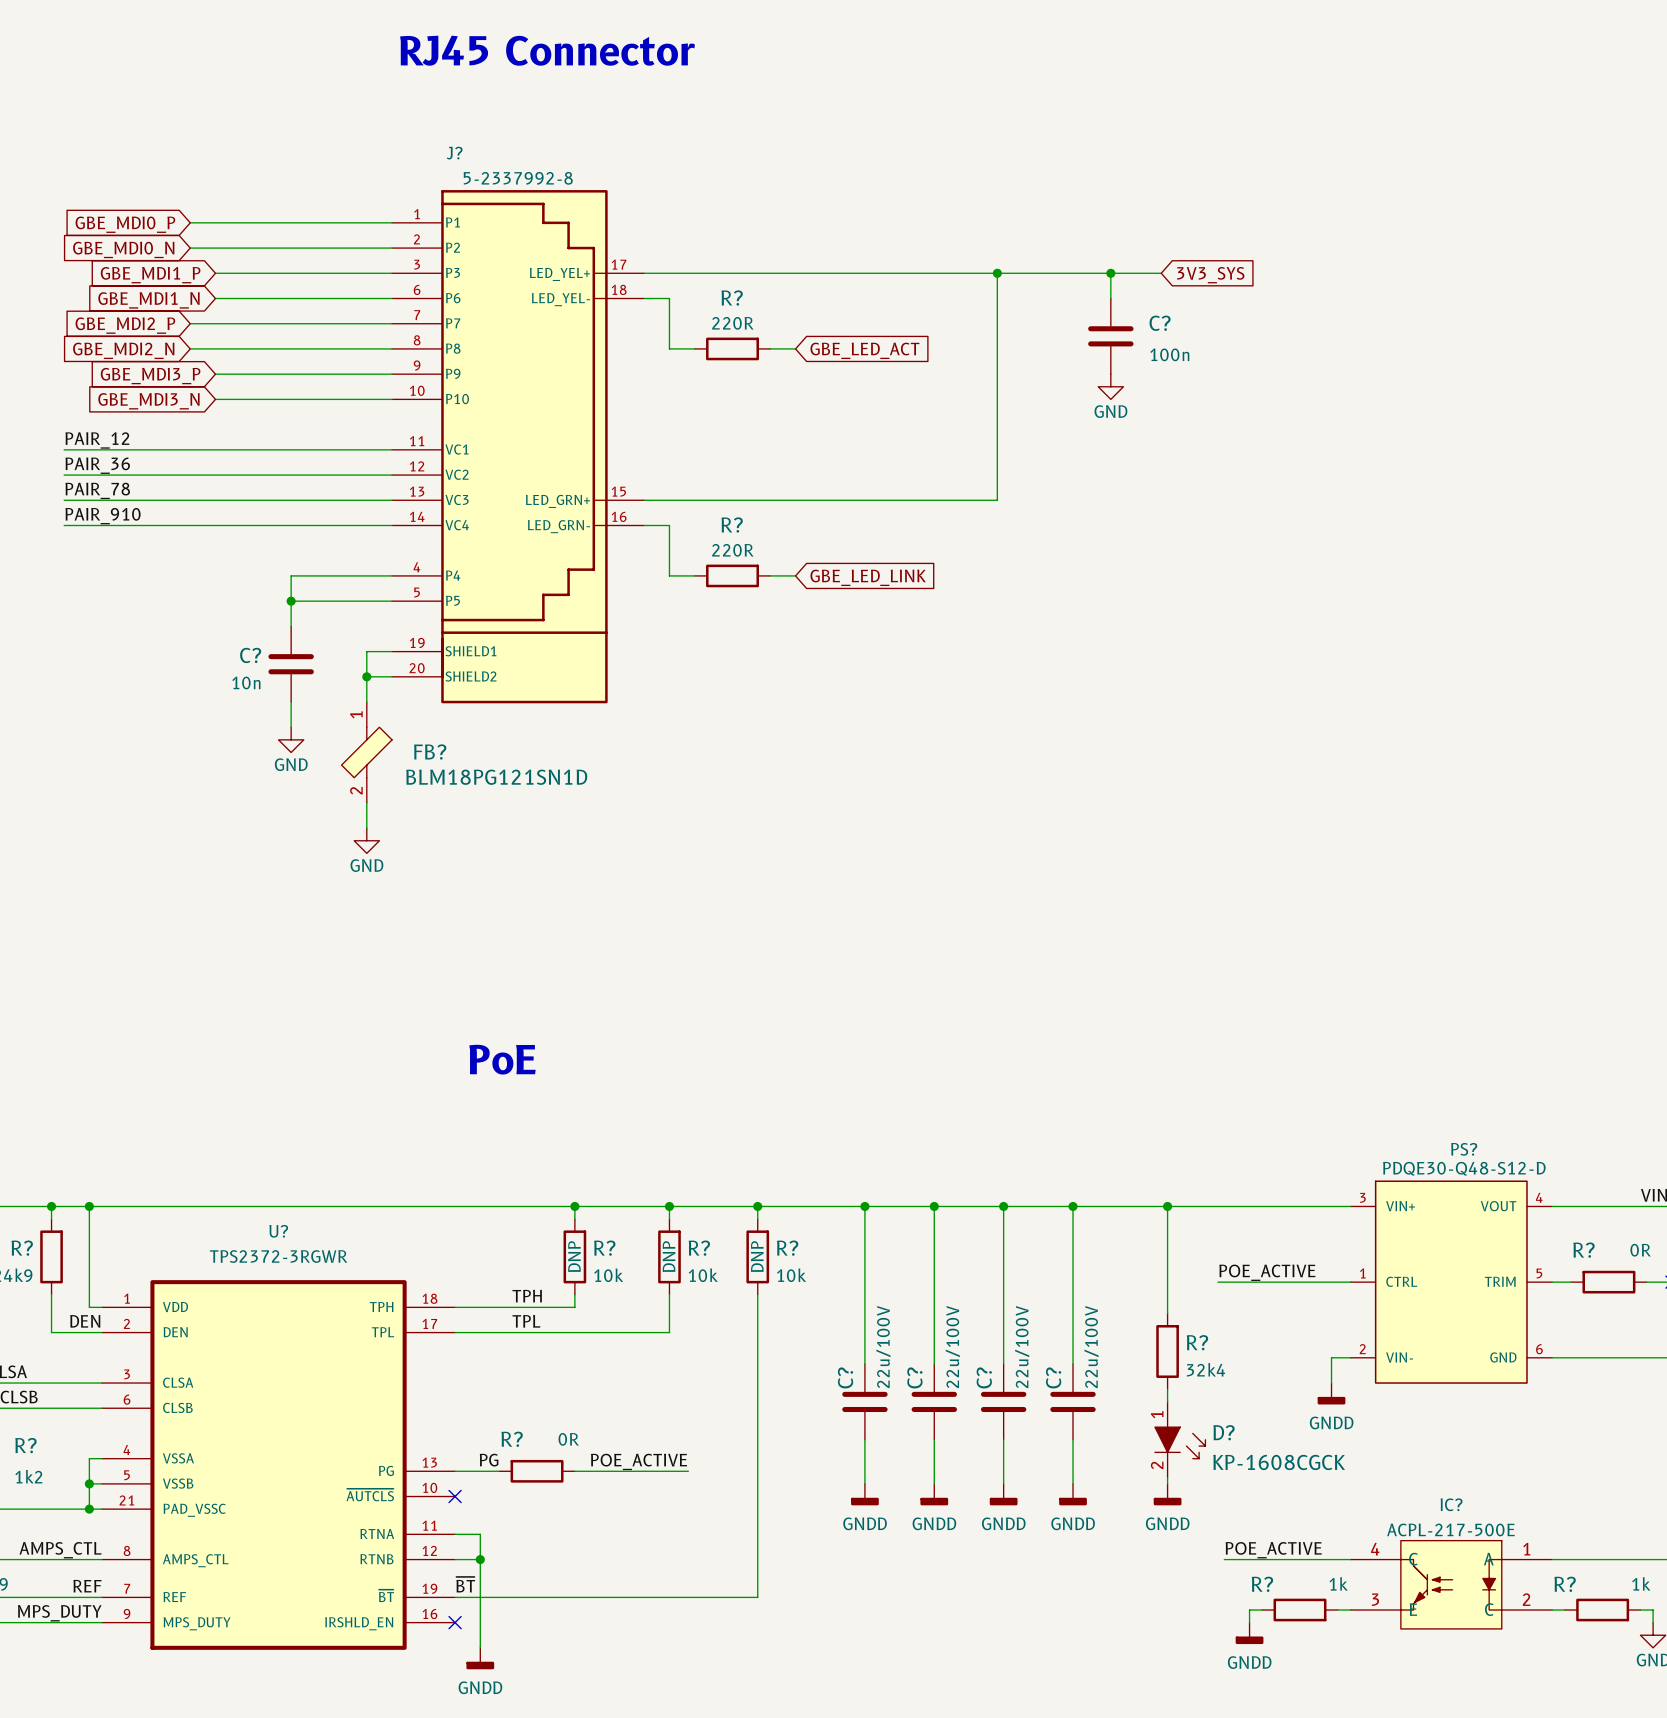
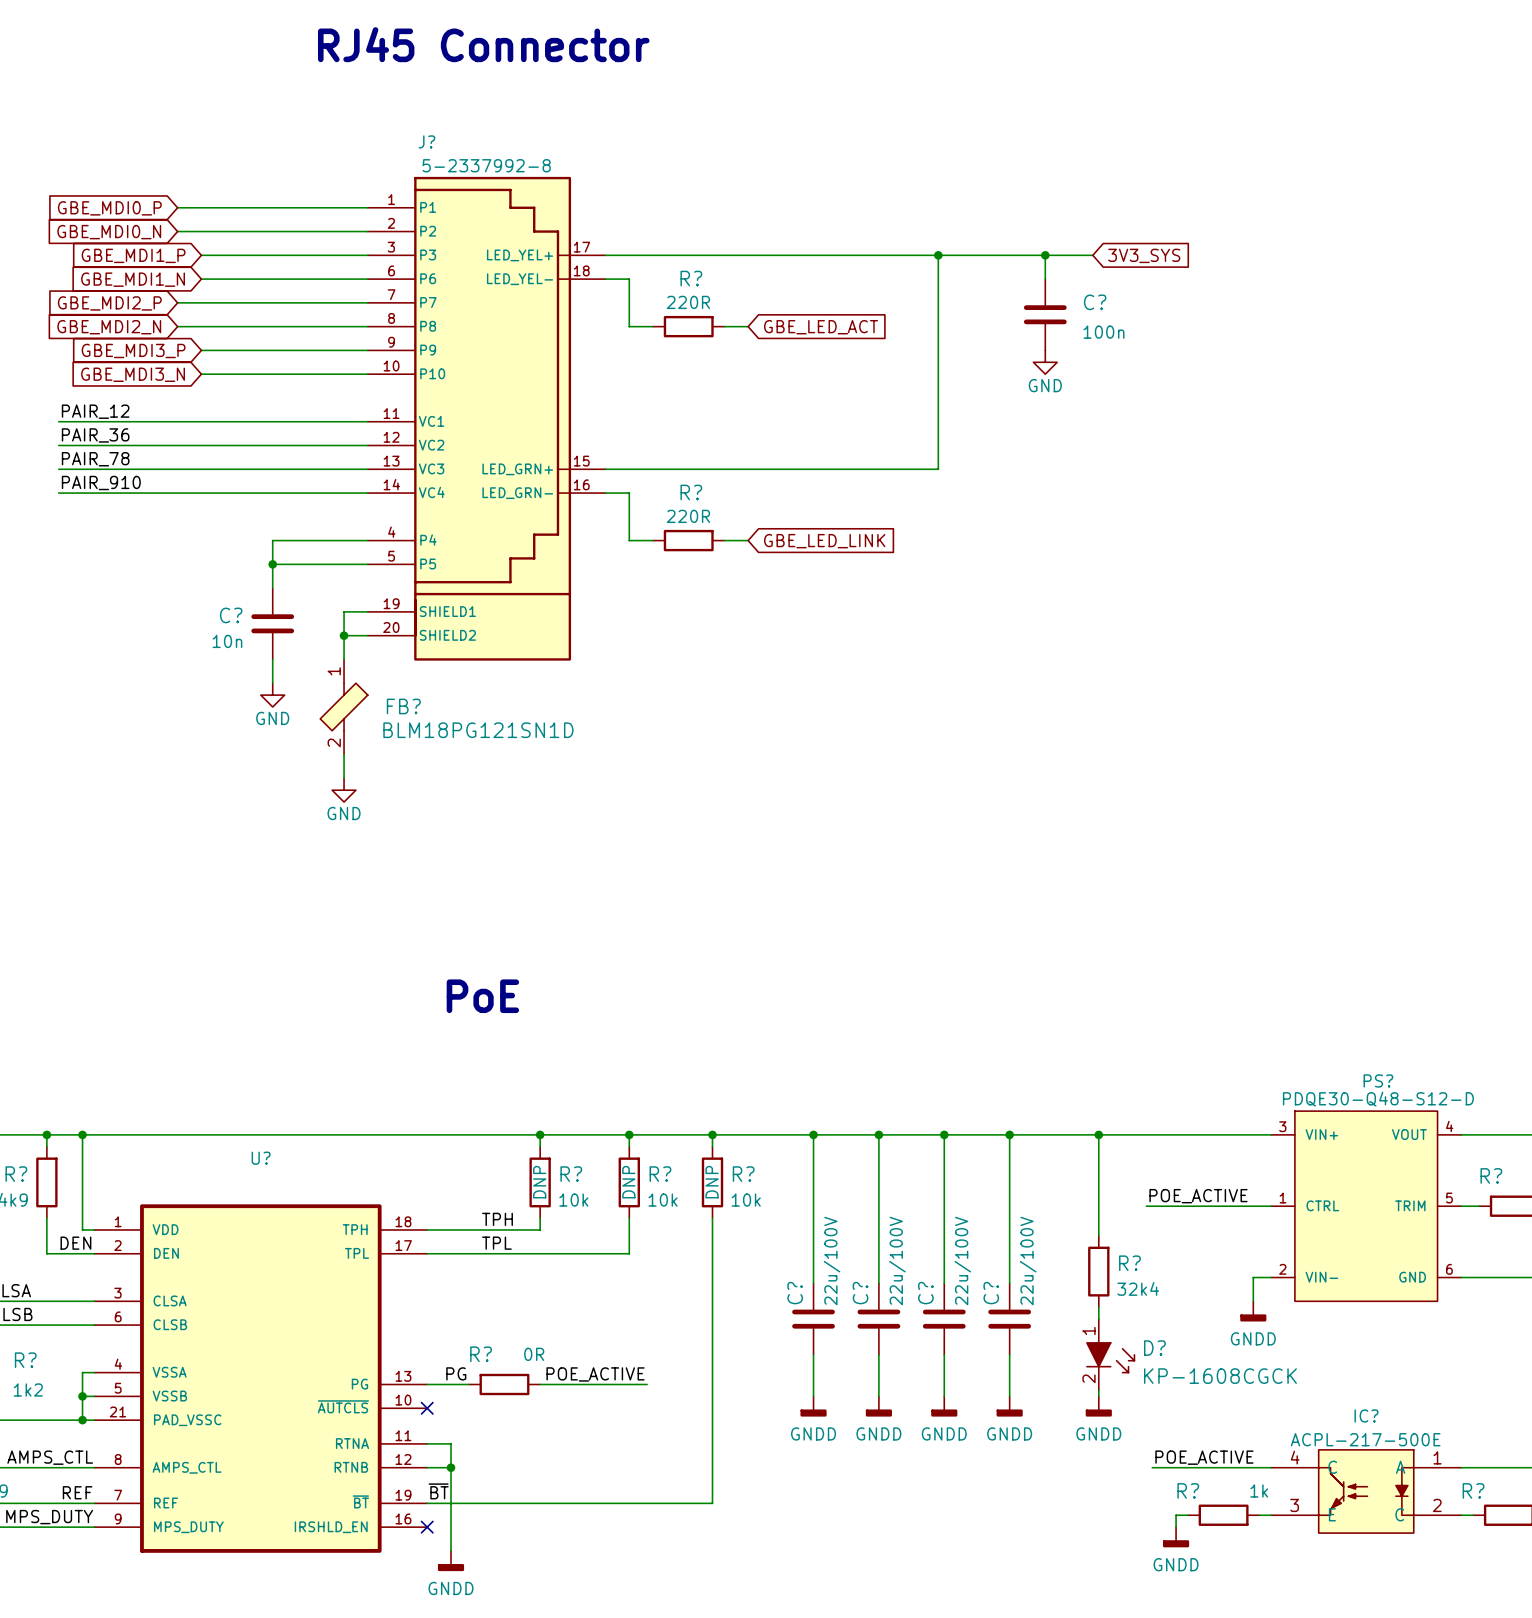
U? value: TPS2372-3RGWR (278, 1256) -> none

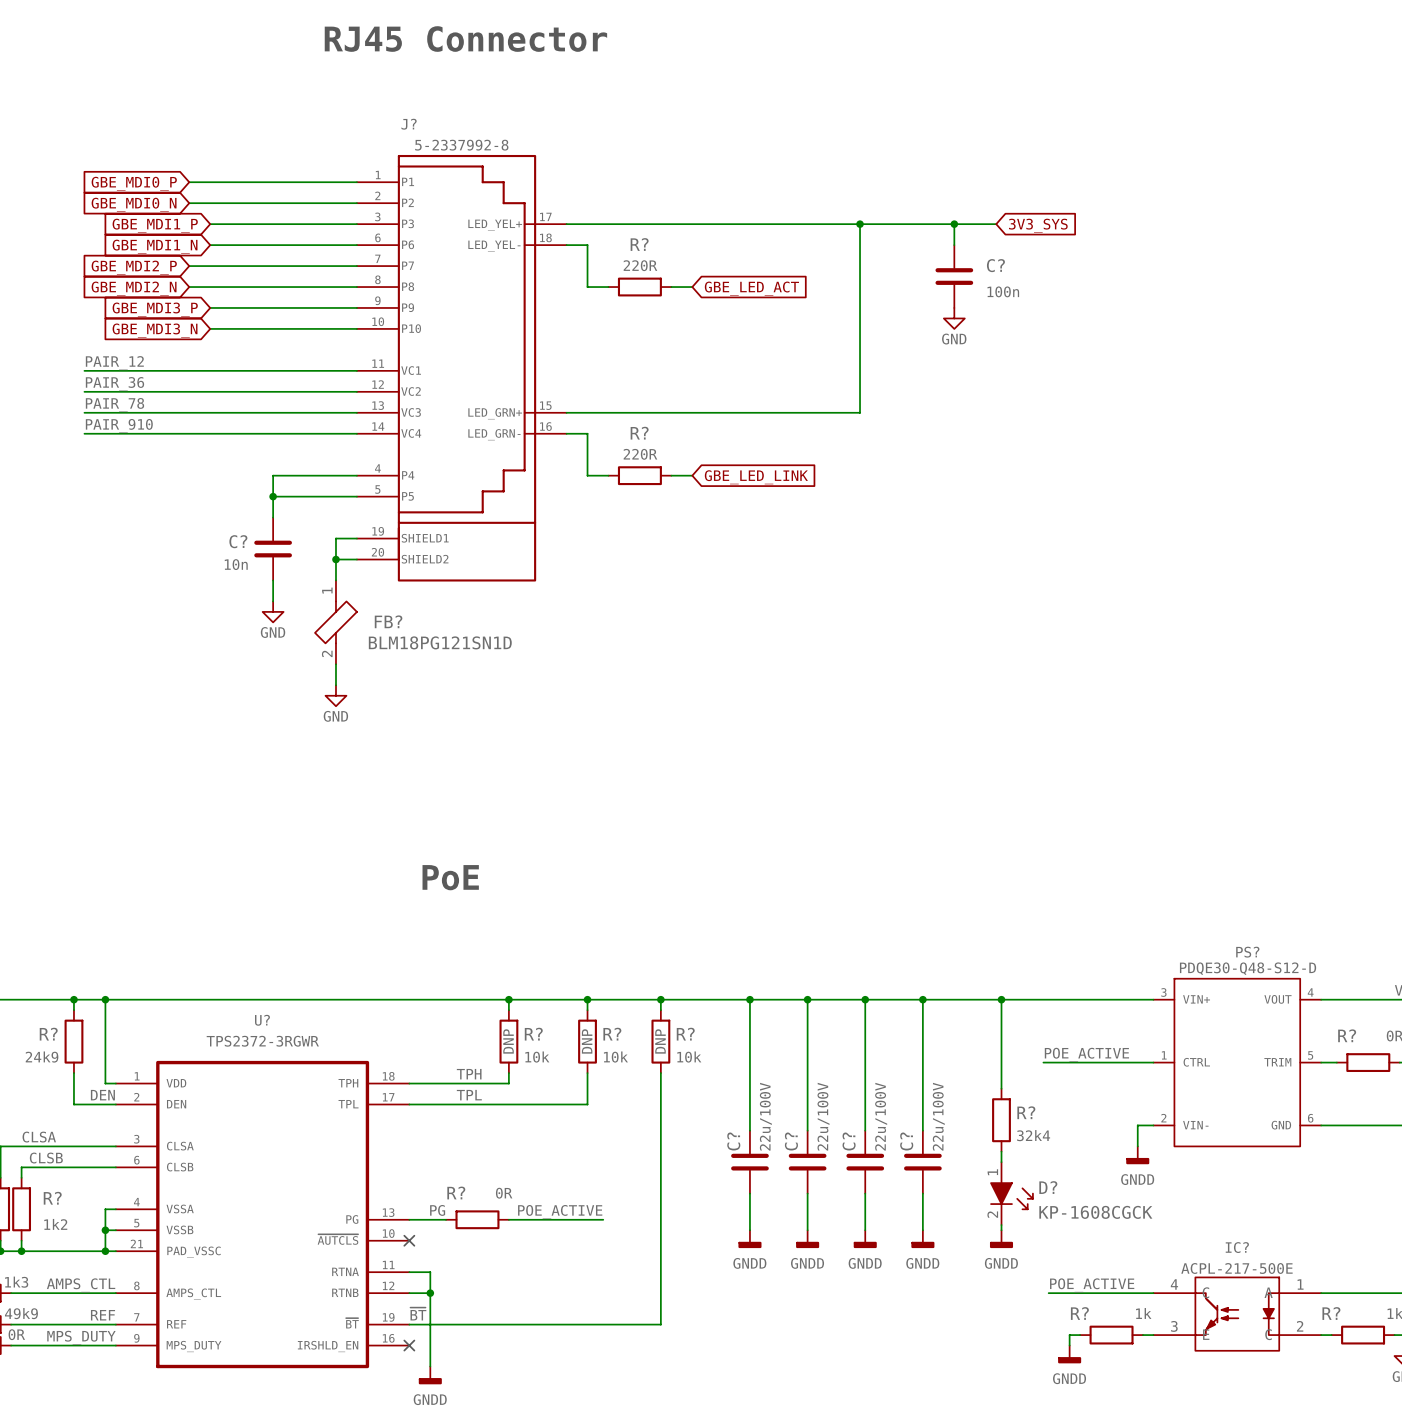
U? value: none -> TPS2372-3RGWR (262, 1041)

